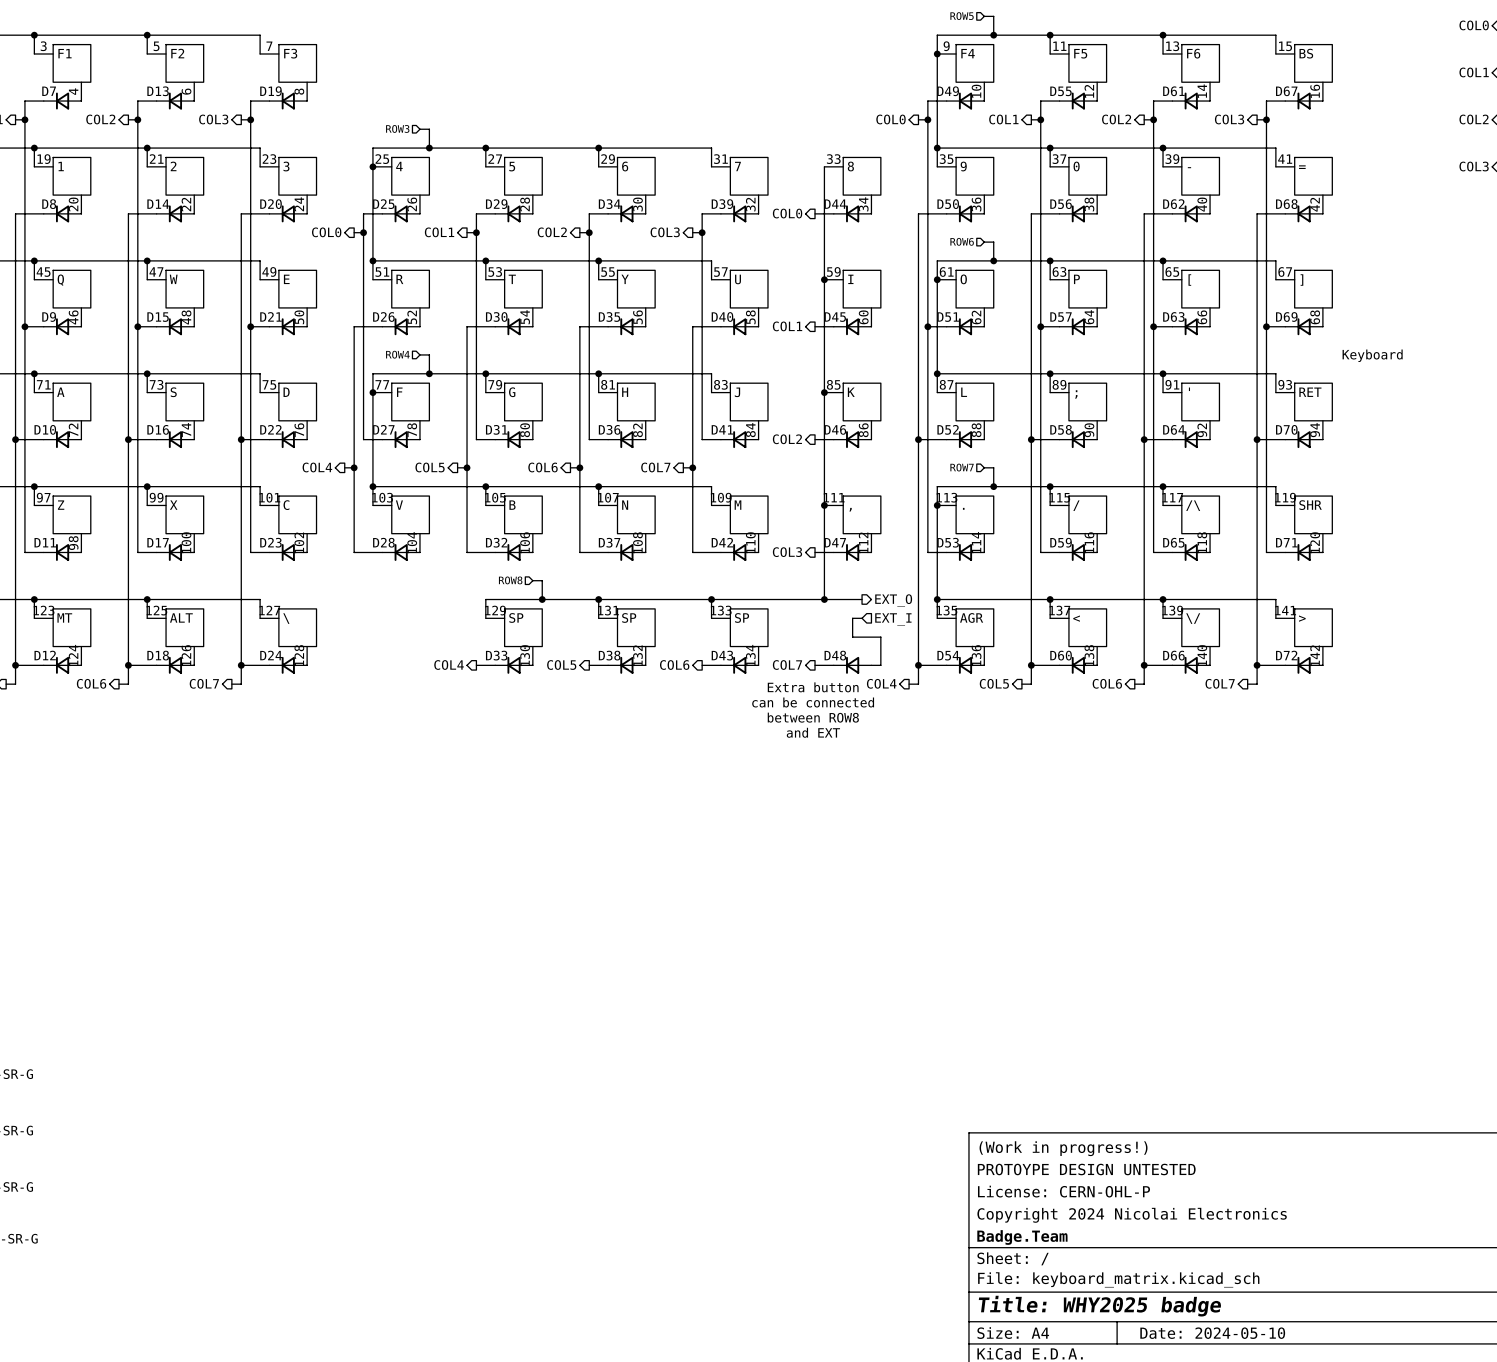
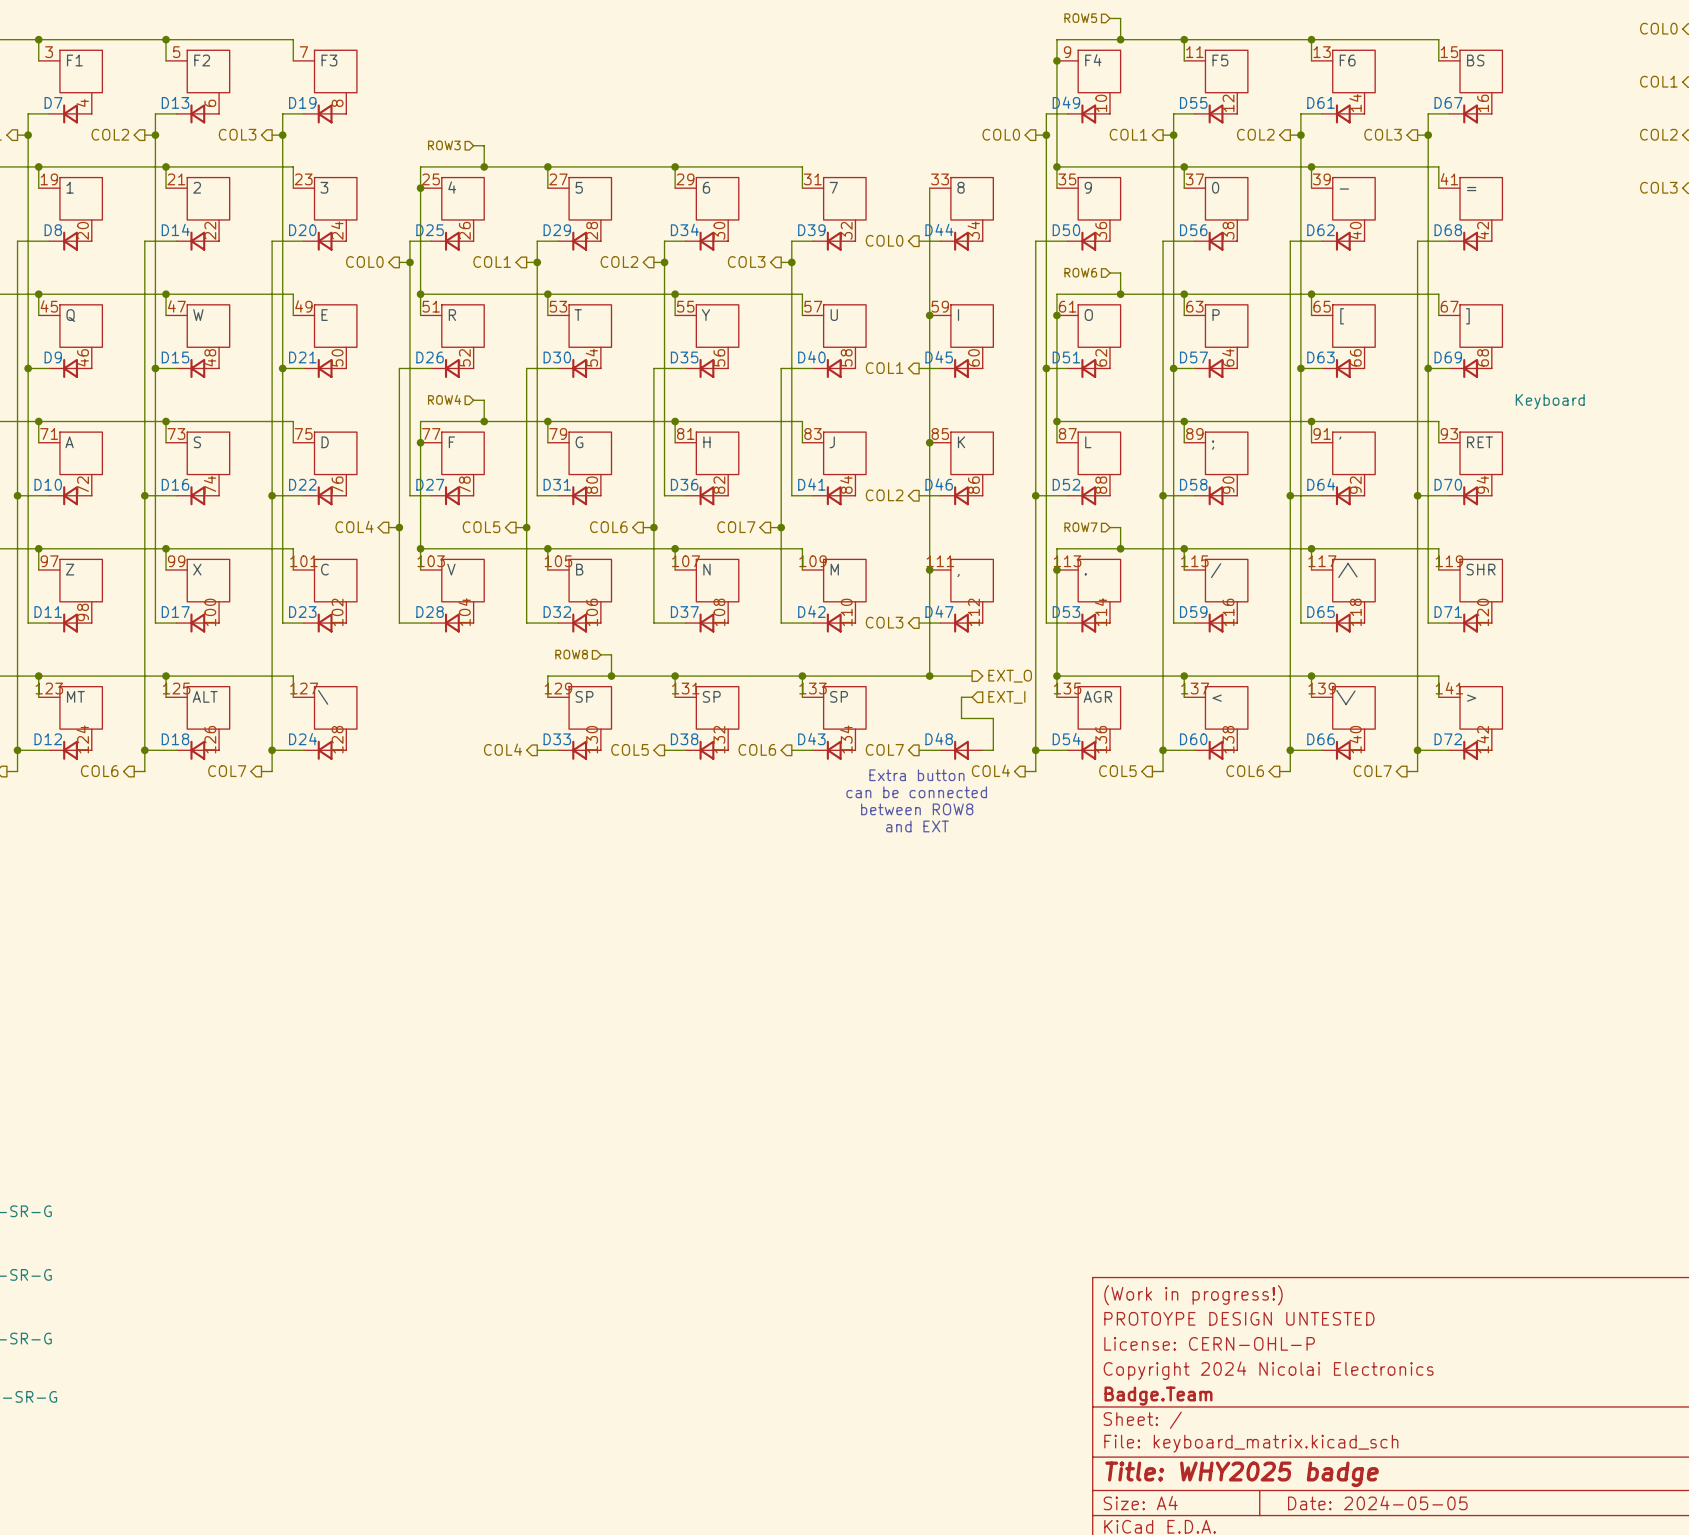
title block: Date: 2024-05-10 (1212, 1333) -> Date: 2024-05-05 (1377, 1503)

